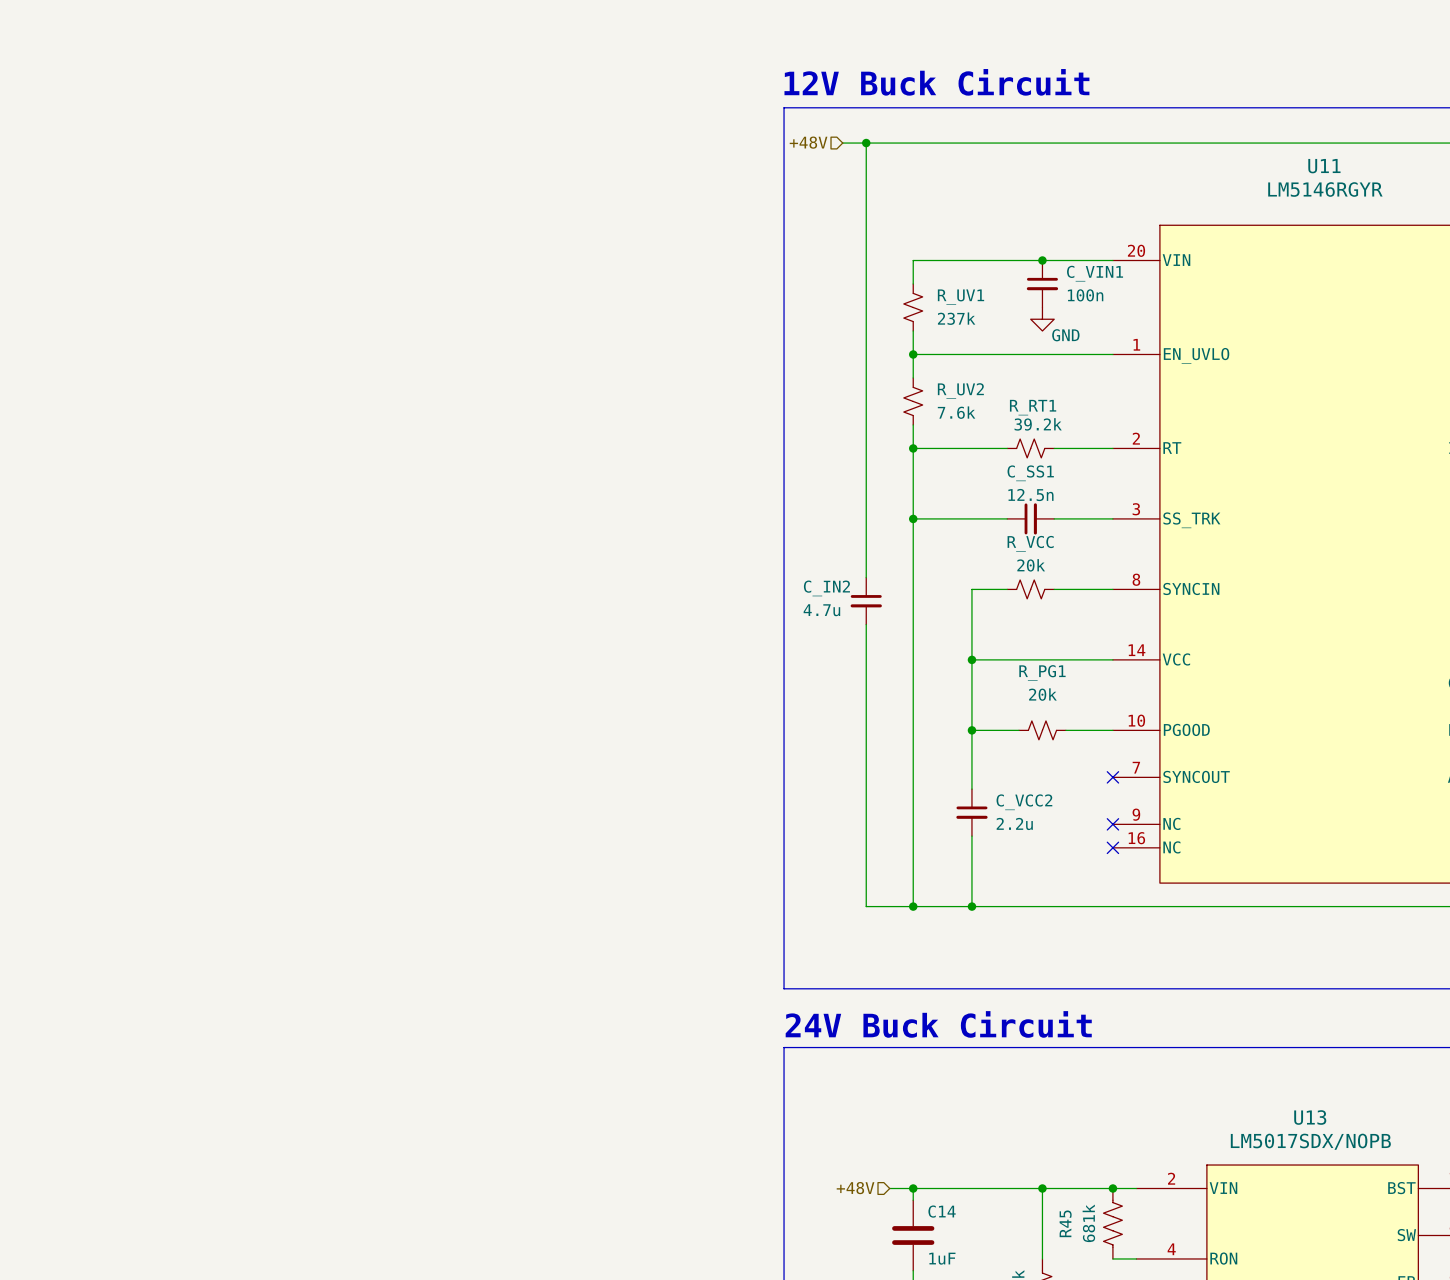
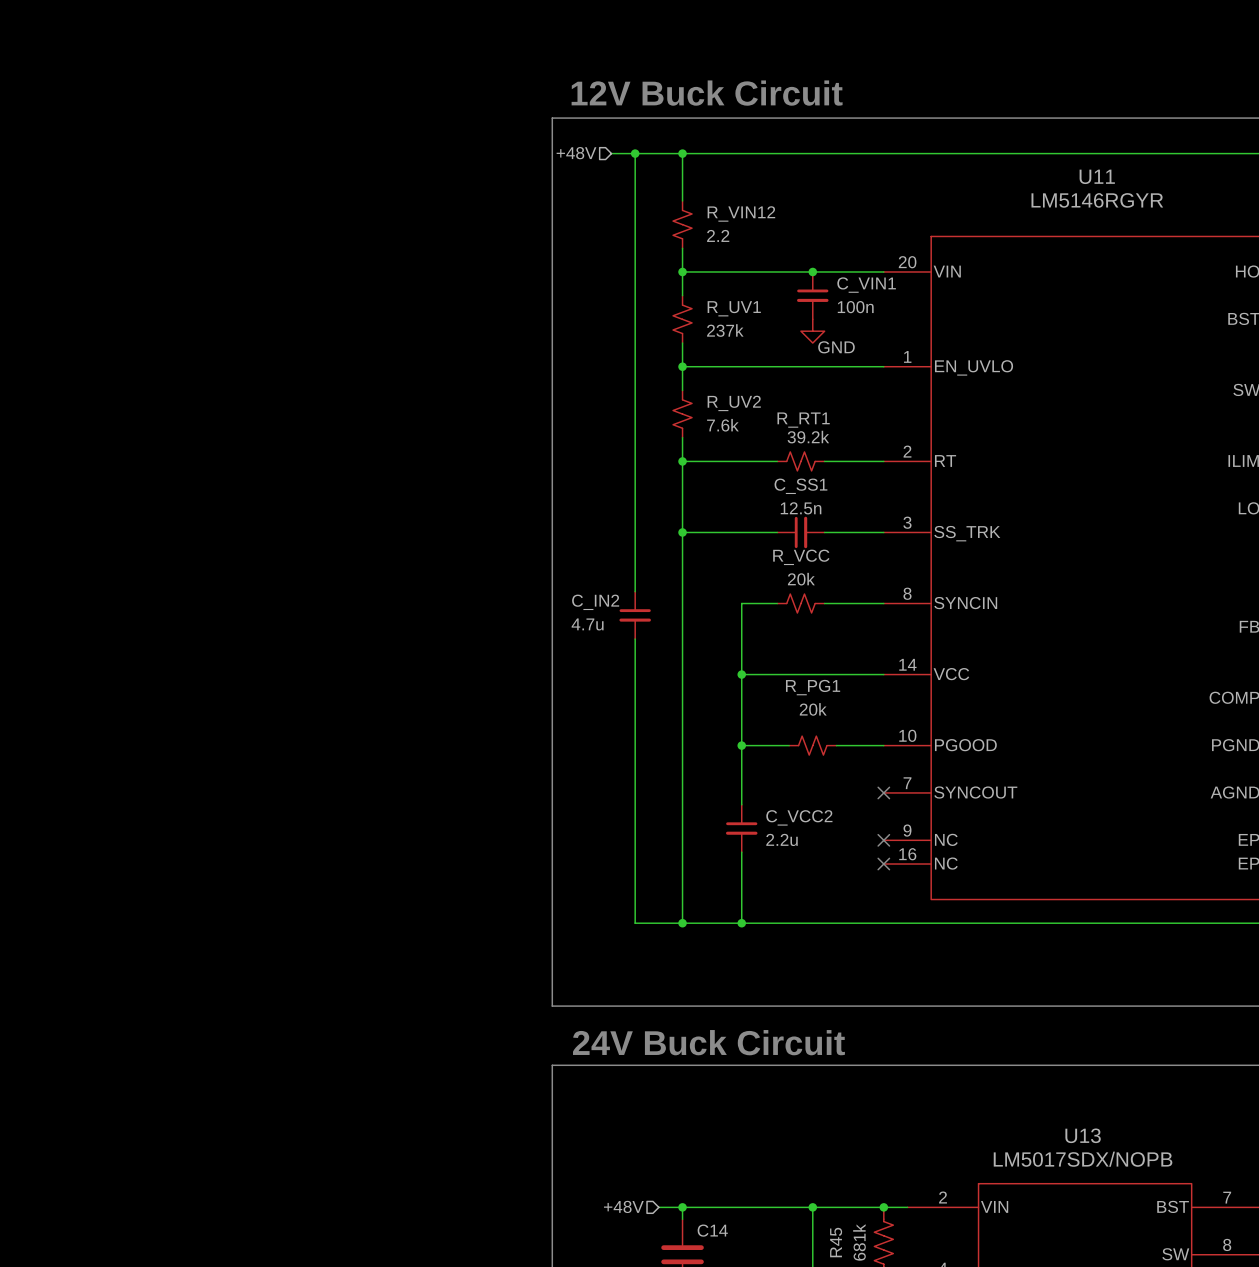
wire: none -> (682, 153) (682, 200)
junction: none -> (682, 153)
R_VIN12: none -> 2.2 (682, 224)
wire: none -> (682, 248) (682, 271)
junction: none -> (682, 271)

